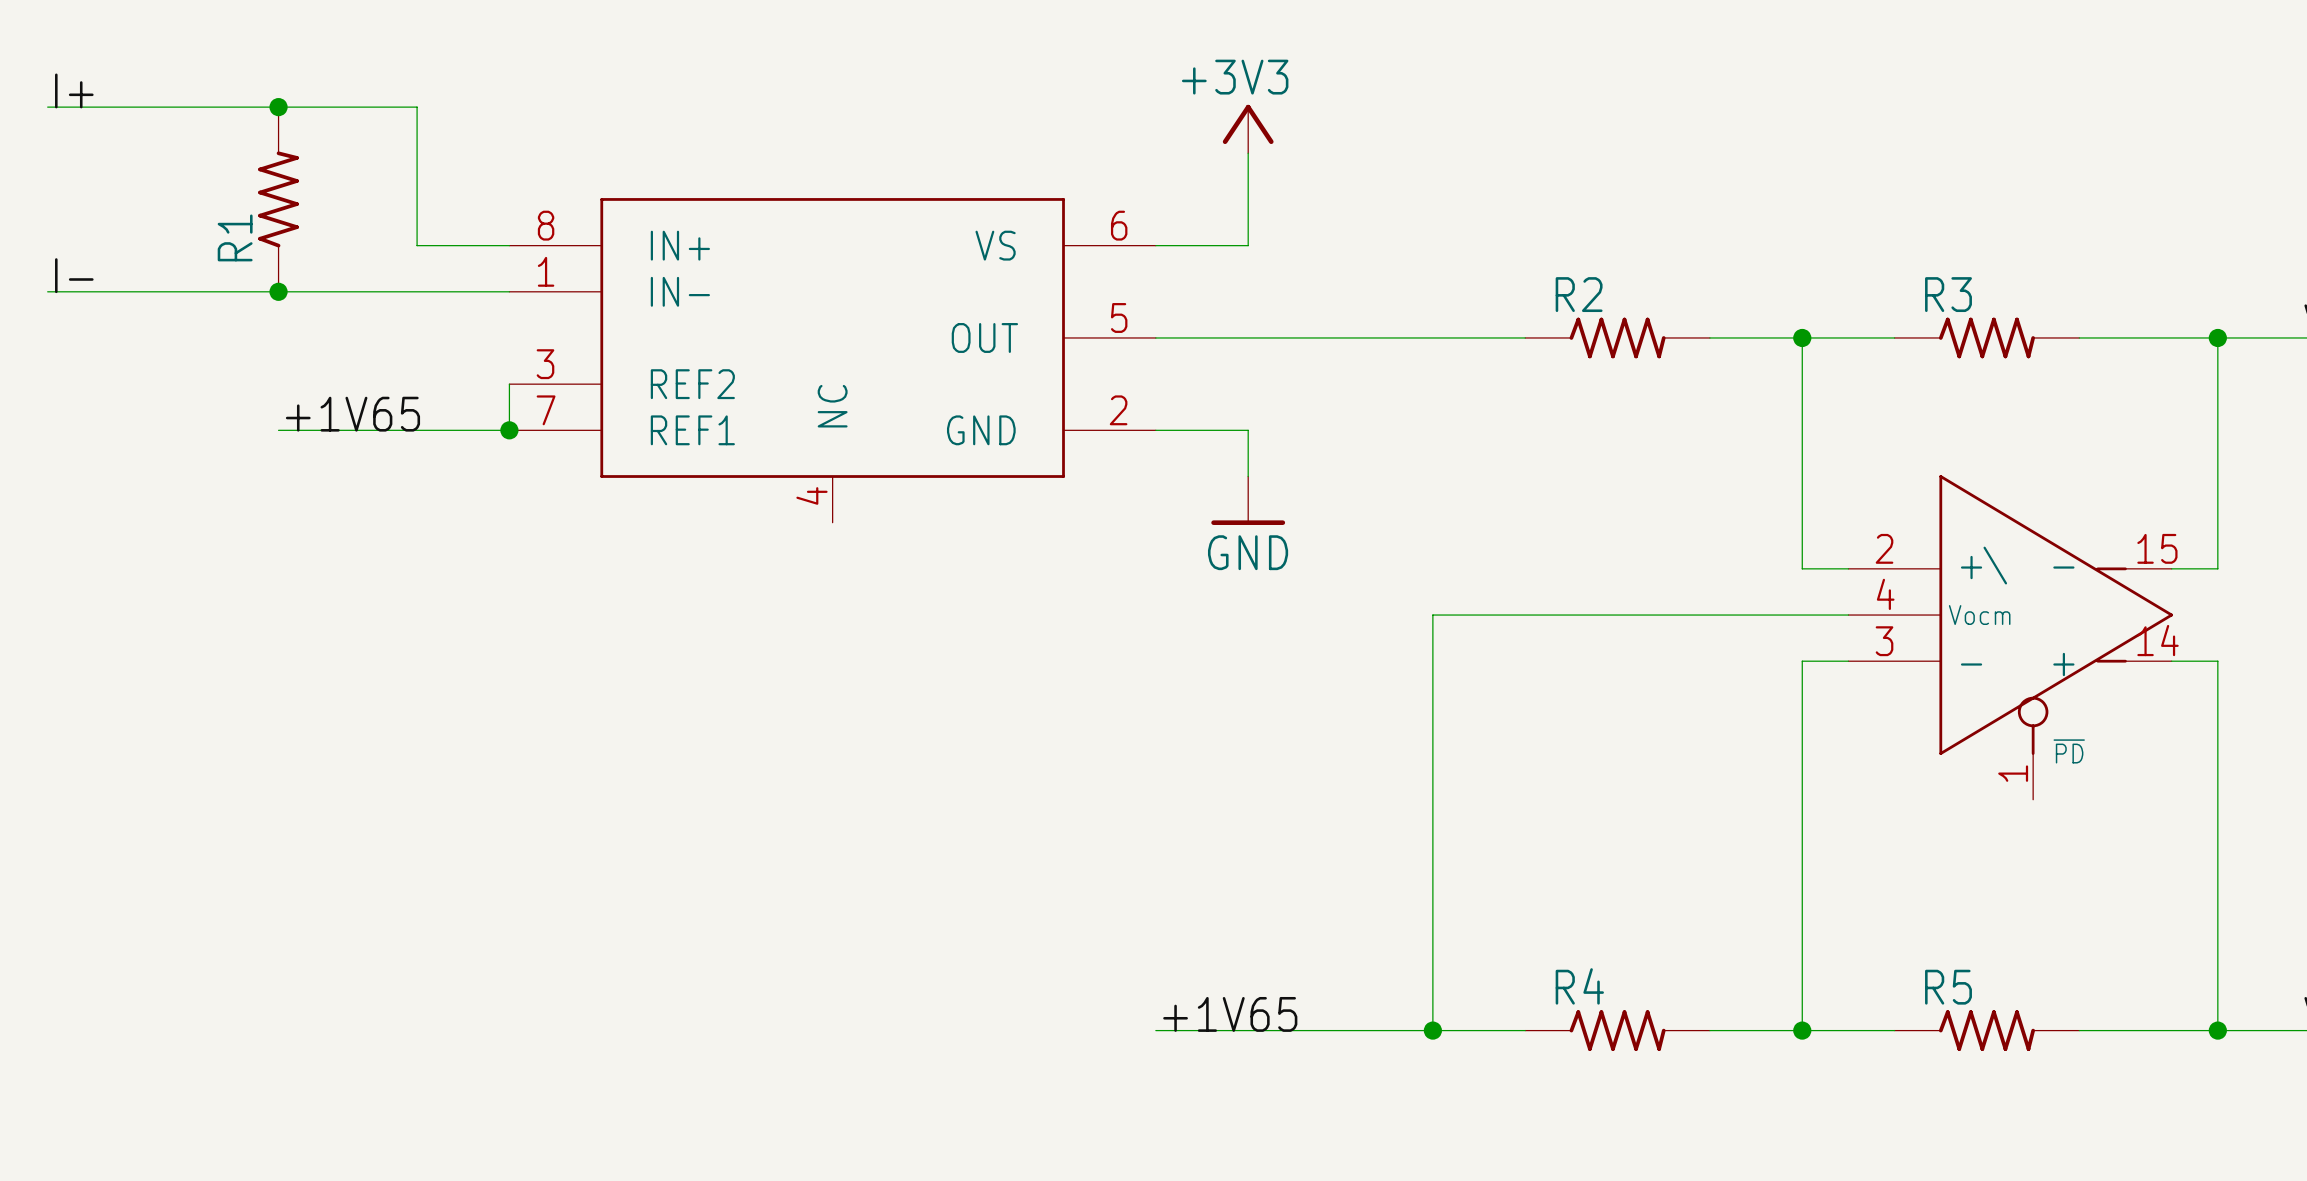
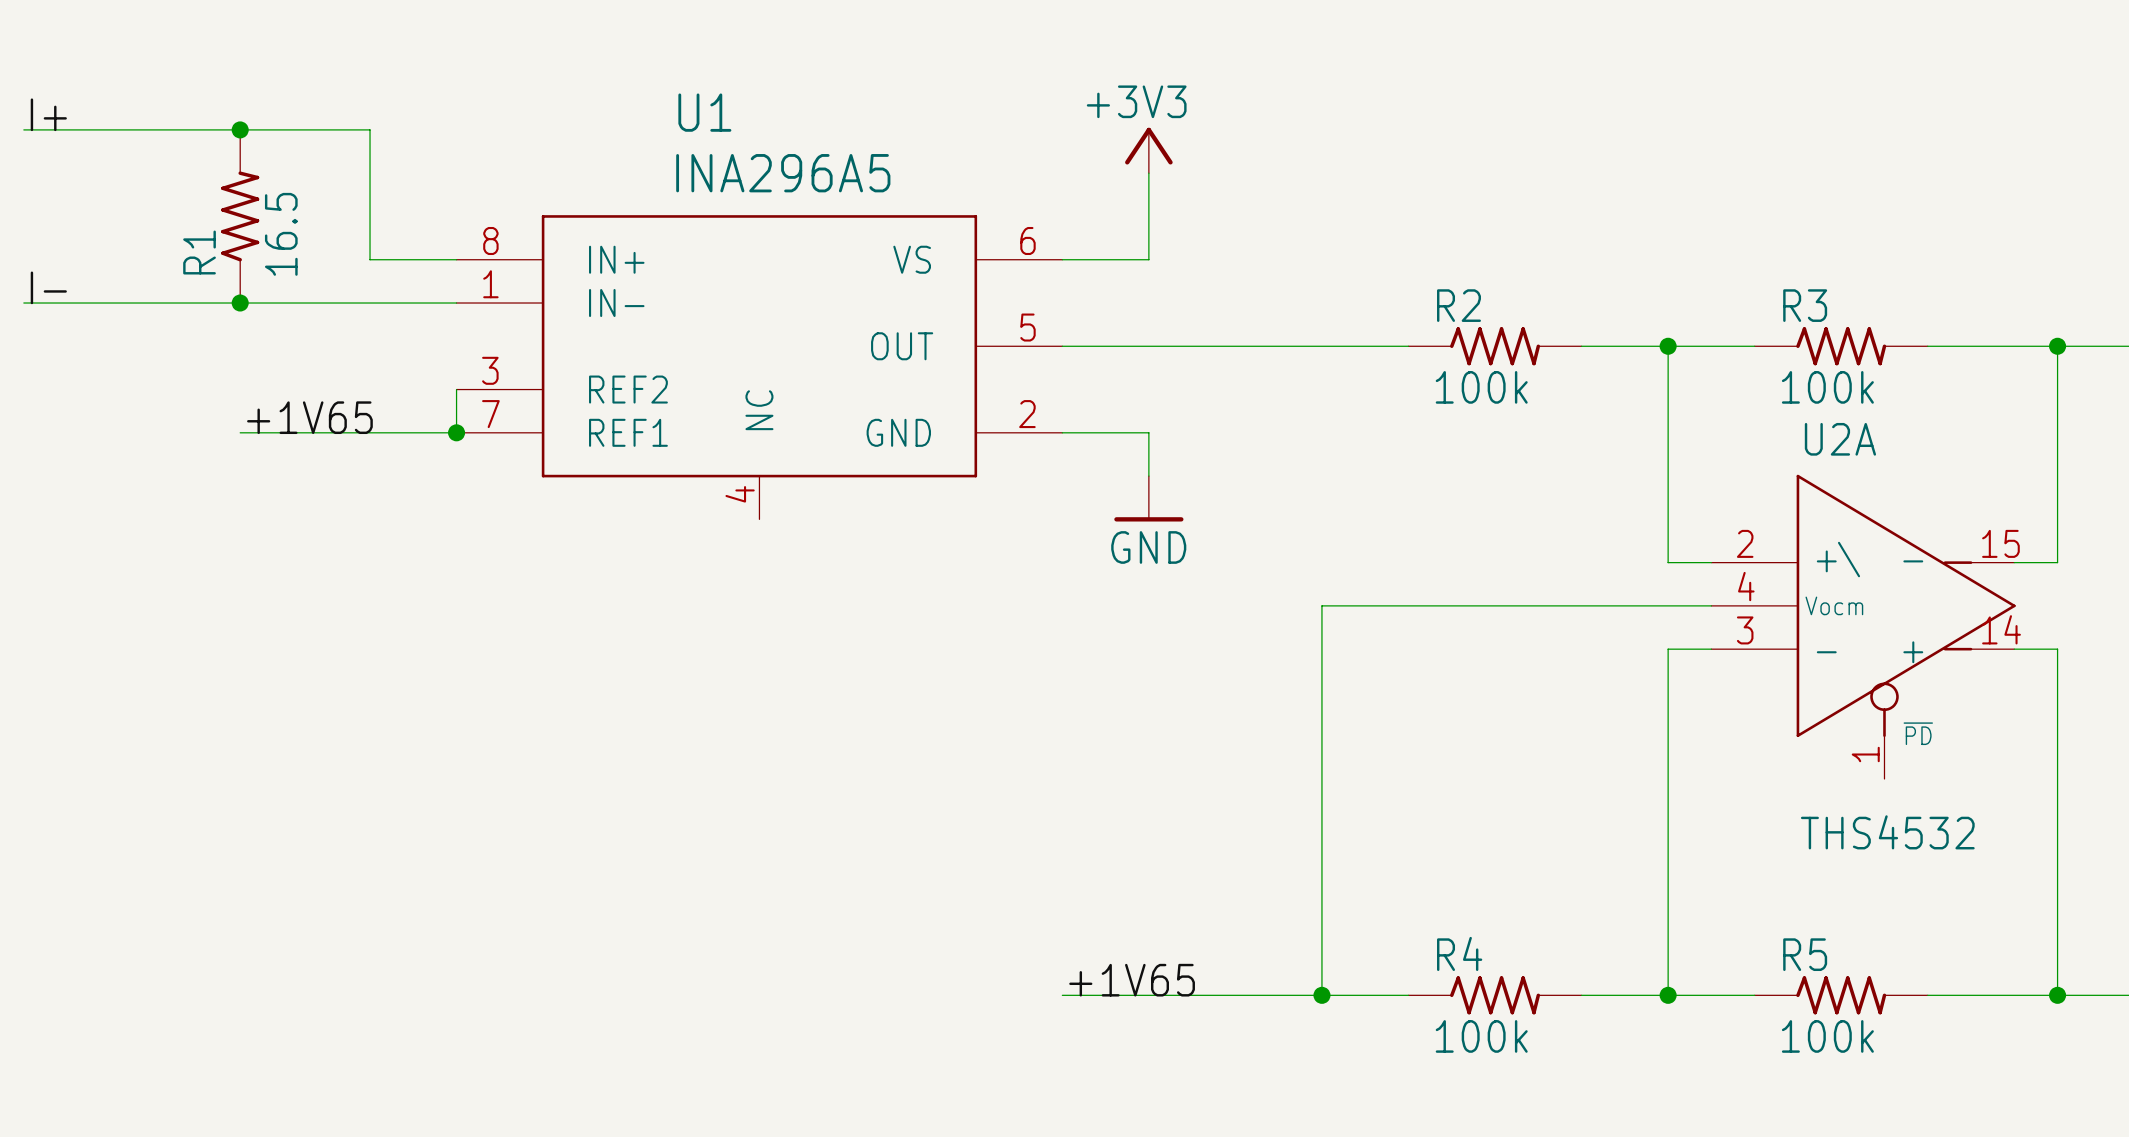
U1 name: none -> U1 (704, 112)
U1 value: none -> INA296A5 (783, 173)
R1 value: none -> 16.5 (281, 234)
R2 value: none -> 100k (1481, 387)
R3 value: none -> 100k (1827, 387)
U2A name: none -> U2A (1840, 439)
U2A value: none -> THS4532 (1887, 832)
R4 value: none -> 100k (1481, 1036)
R5 value: none -> 100k (1827, 1036)

